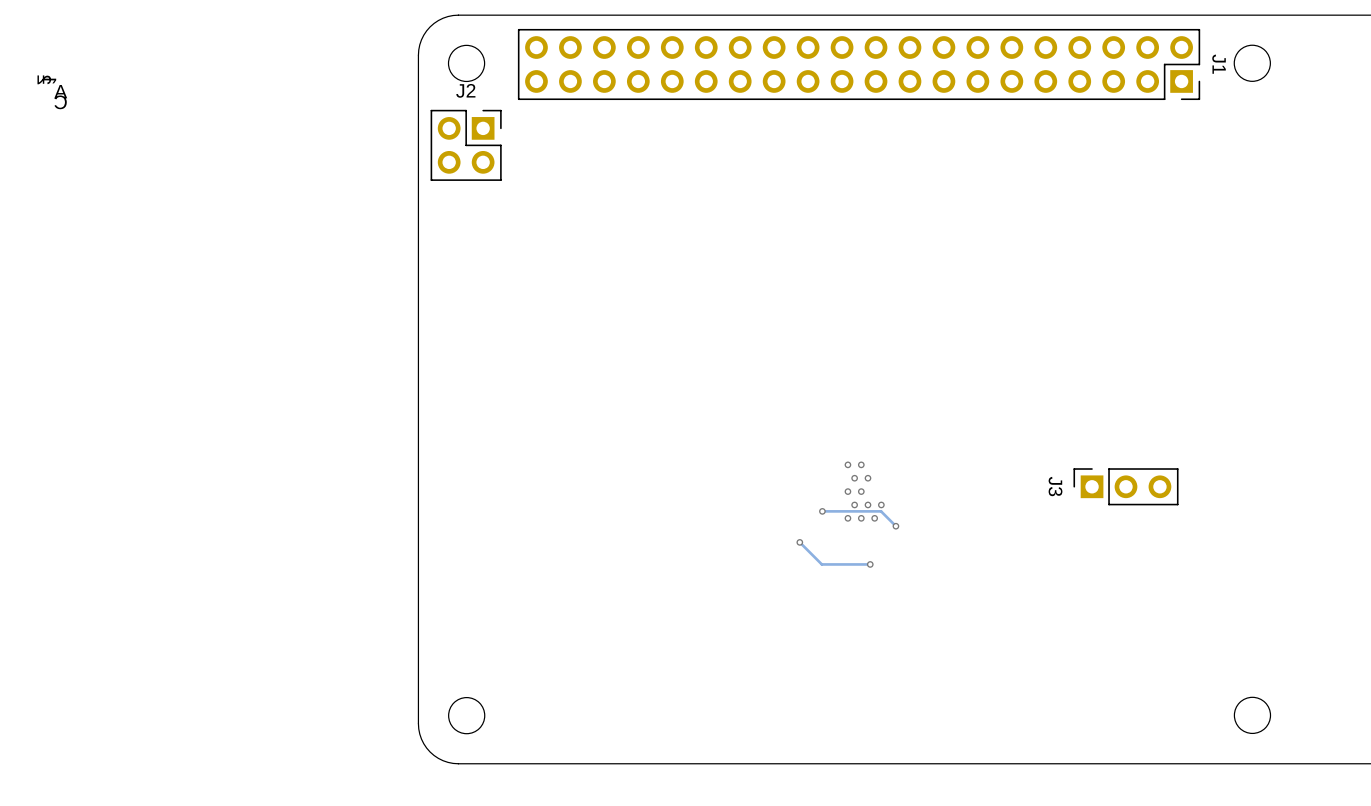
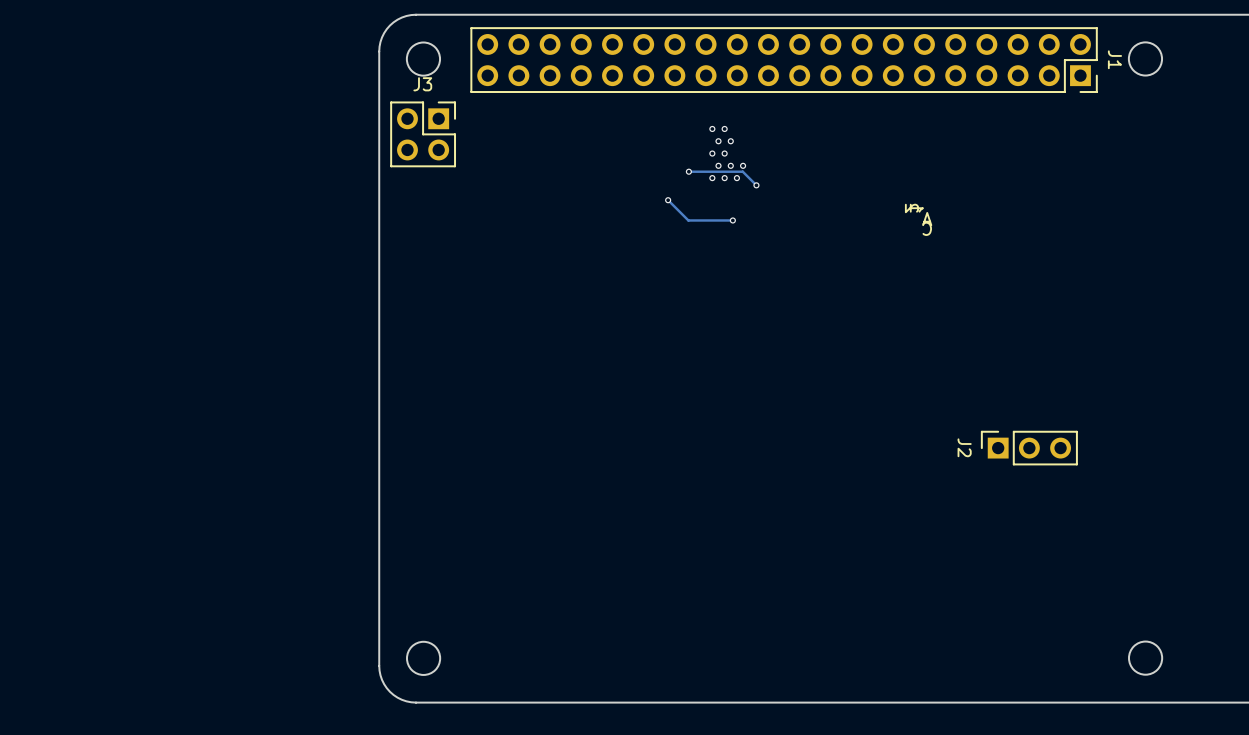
J2 name: J2 (465, 90) -> J3 (422, 84)
part: (52, 92) -> none
via: none -> (712, 128)
via: none -> (724, 128)
via: none -> (718, 141)
via: none -> (730, 141)
via: none -> (712, 153)
via: none -> (724, 153)
via: none -> (718, 165)
via: none -> (730, 165)
via: none -> (743, 165)
via: none -> (688, 171)
via: none -> (712, 178)
via: none -> (724, 178)
via: none -> (736, 178)
via: none -> (756, 185)
via: none -> (668, 200)
part: none -> (918, 219)
via: none -> (732, 220)
via: (847, 464) -> none
via: (861, 464) -> none
via: (854, 478) -> none
via: (867, 478) -> none
J3 name: J3 (1055, 486) -> J2 (964, 447)
via: (847, 491) -> none
via: (861, 491) -> none
via: (854, 504) -> none
via: (867, 504) -> none
via: (881, 504) -> none
track: (822, 511) (881, 511) (895, 526) -> (688, 171) (742, 171) (756, 185)
via: (822, 511) -> none
via: (847, 518) -> none
via: (861, 518) -> none
via: (874, 518) -> none
via: (895, 526) -> none
track: (799, 542) (821, 564) (870, 564) -> (668, 200) (688, 220) (732, 220)
via: (799, 542) -> none
via: (870, 564) -> none

